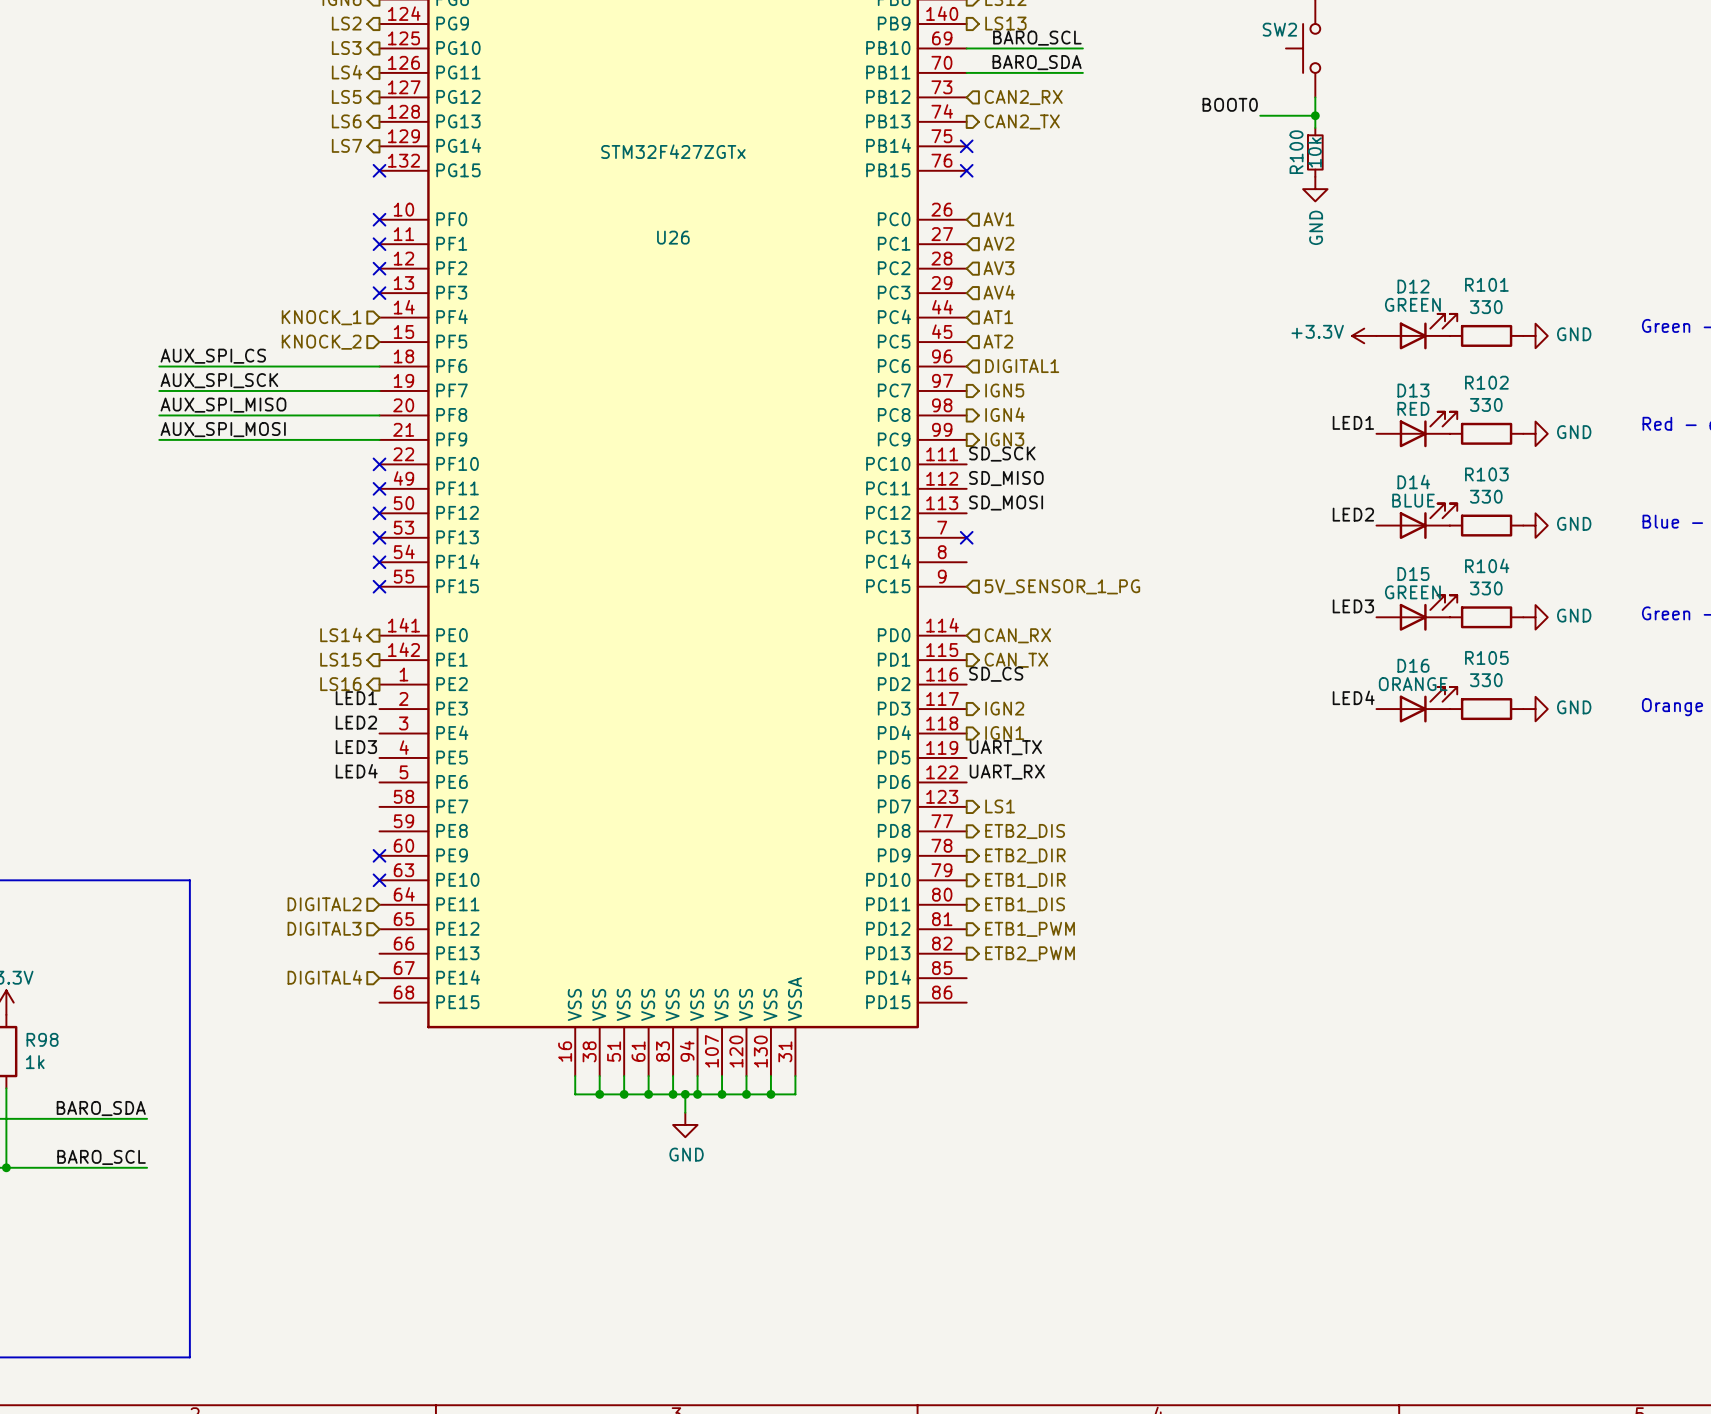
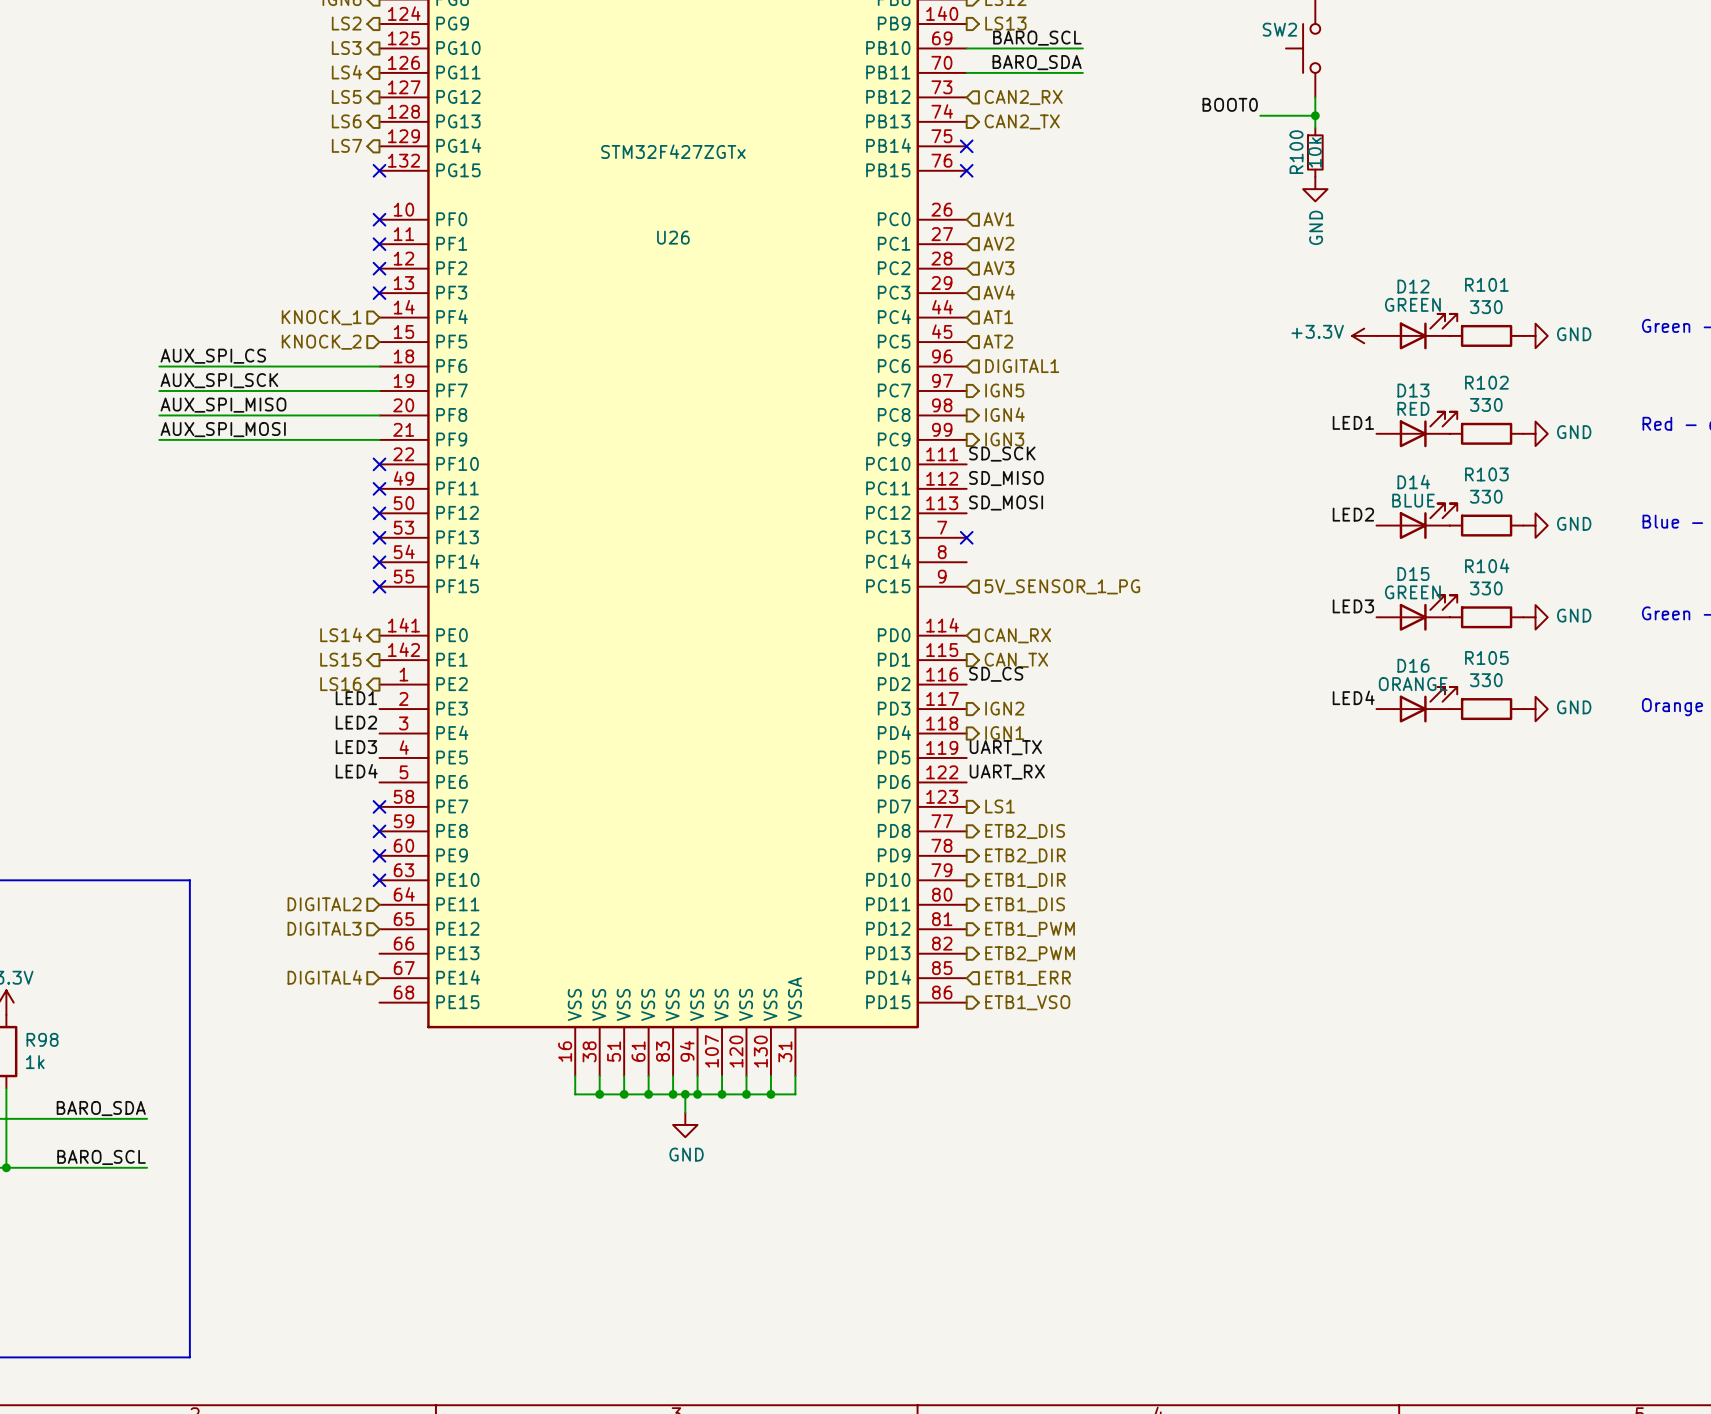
no-connect mark: none -> (379, 806)
no-connect mark: none -> (379, 831)
hierarchical label: none -> ETB1_ERR (1028, 978)
hierarchical label: none -> ETB1_VSO (1027, 1002)

